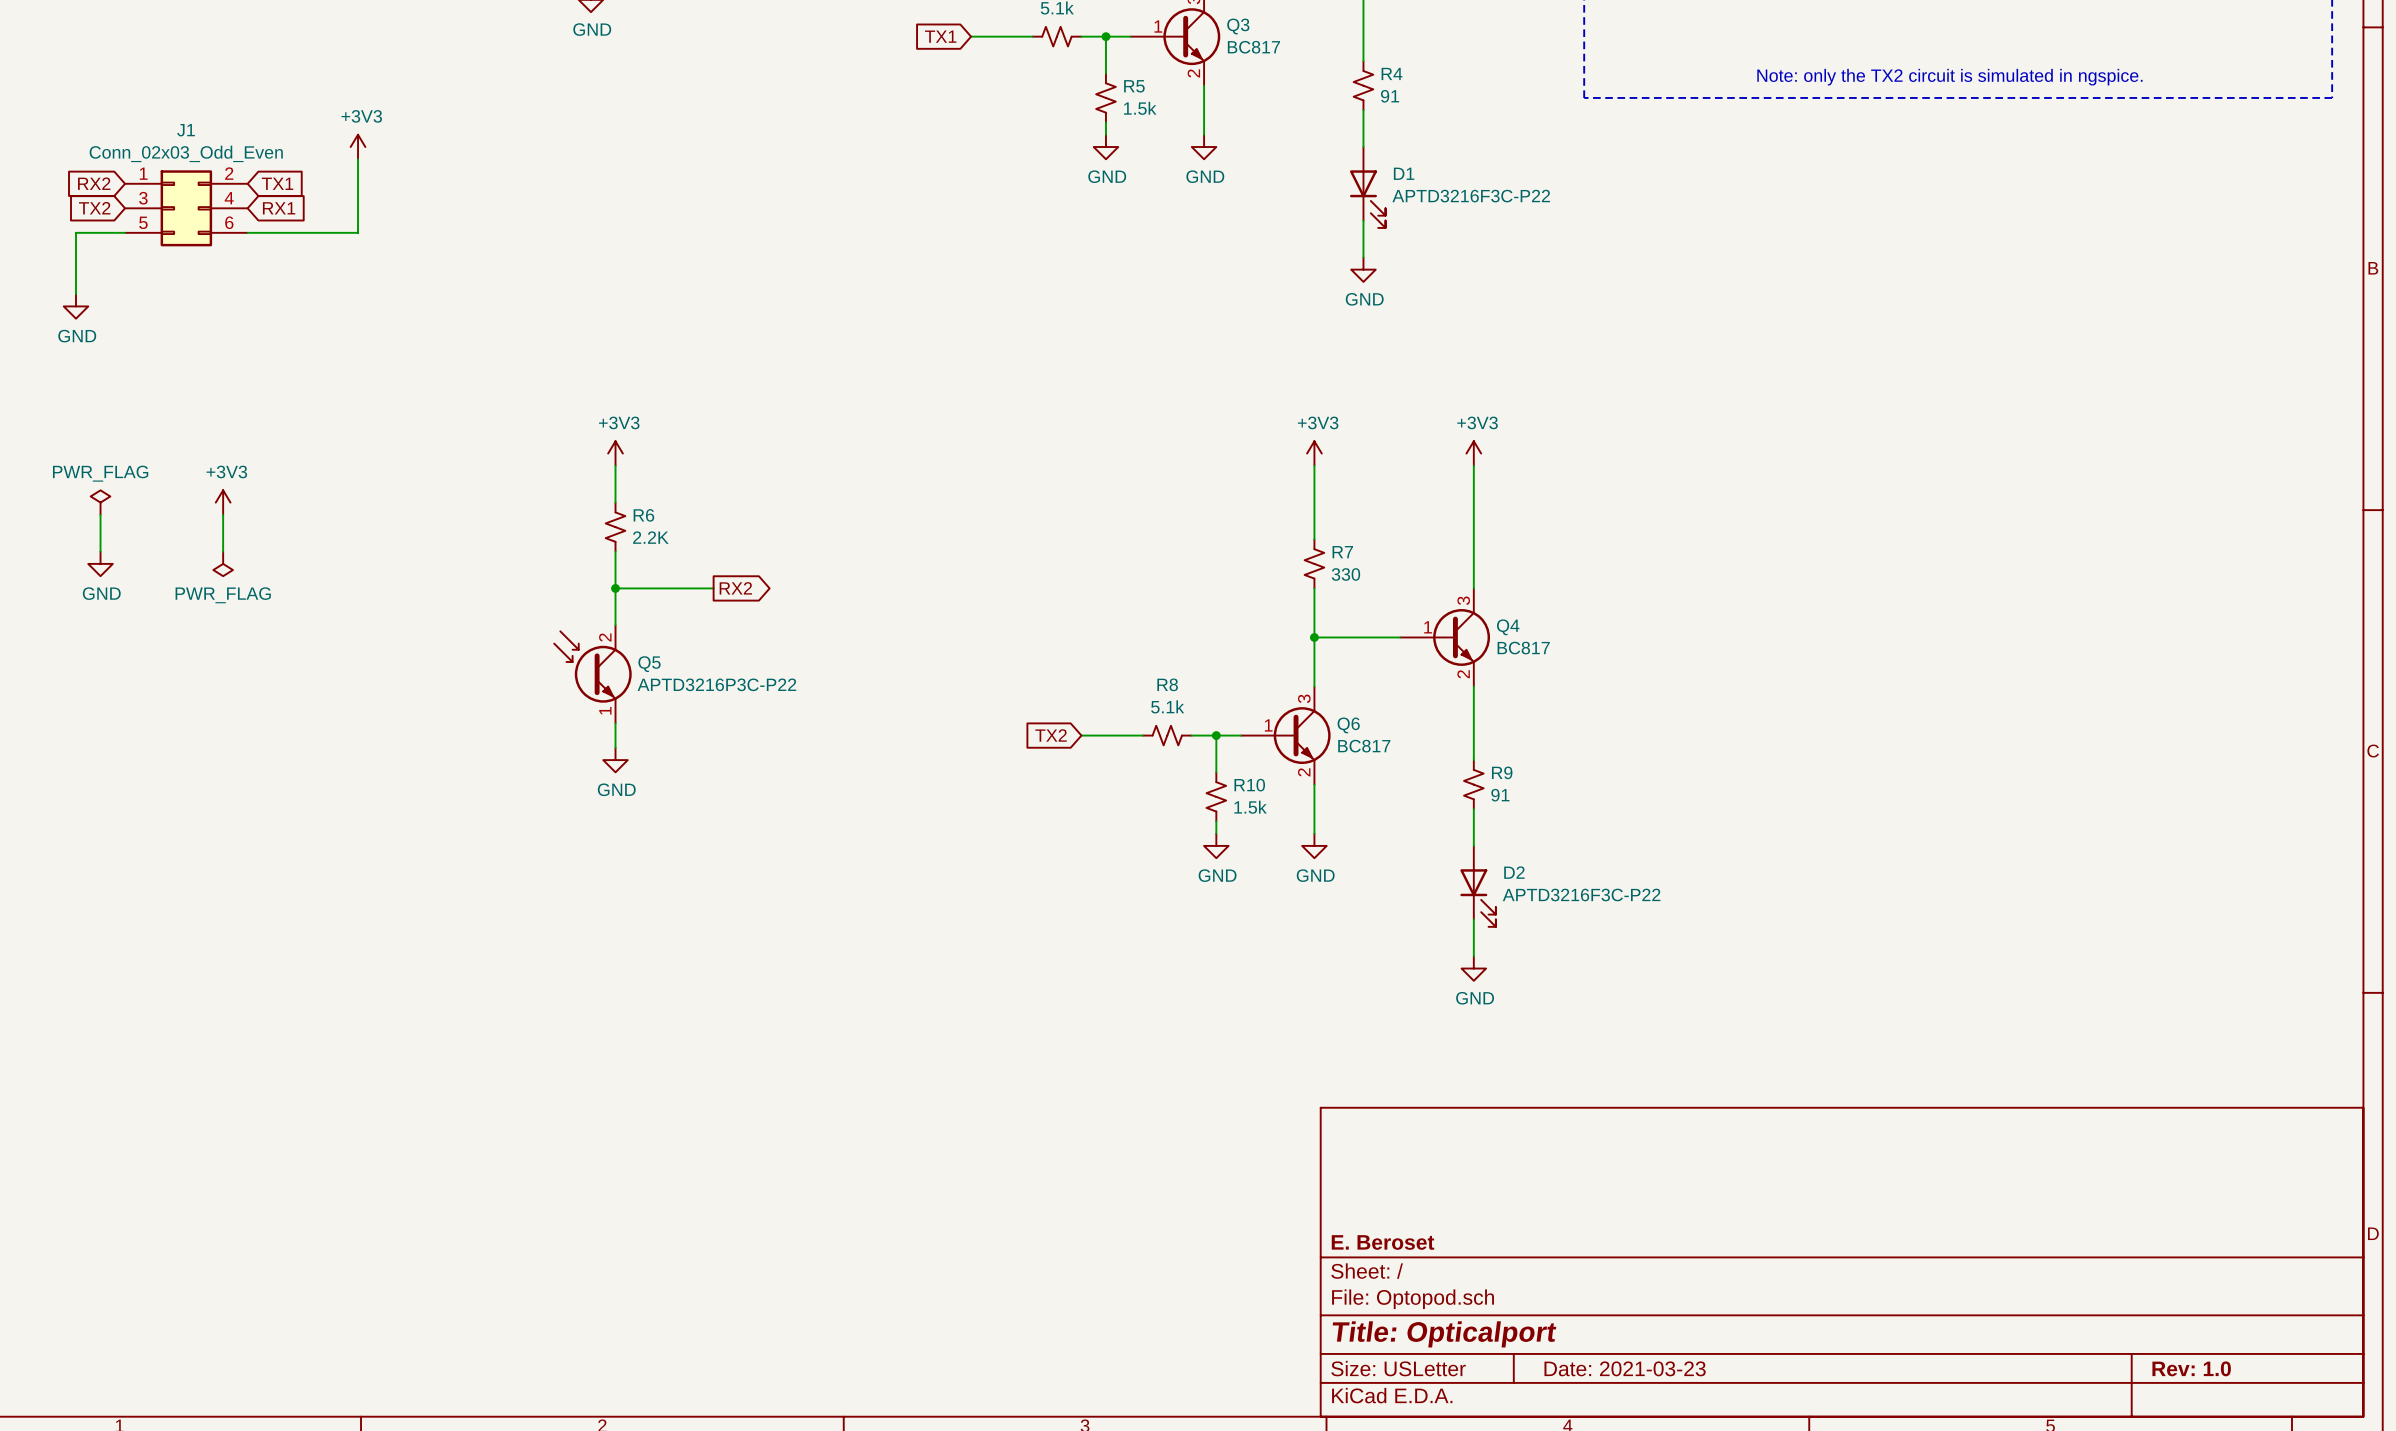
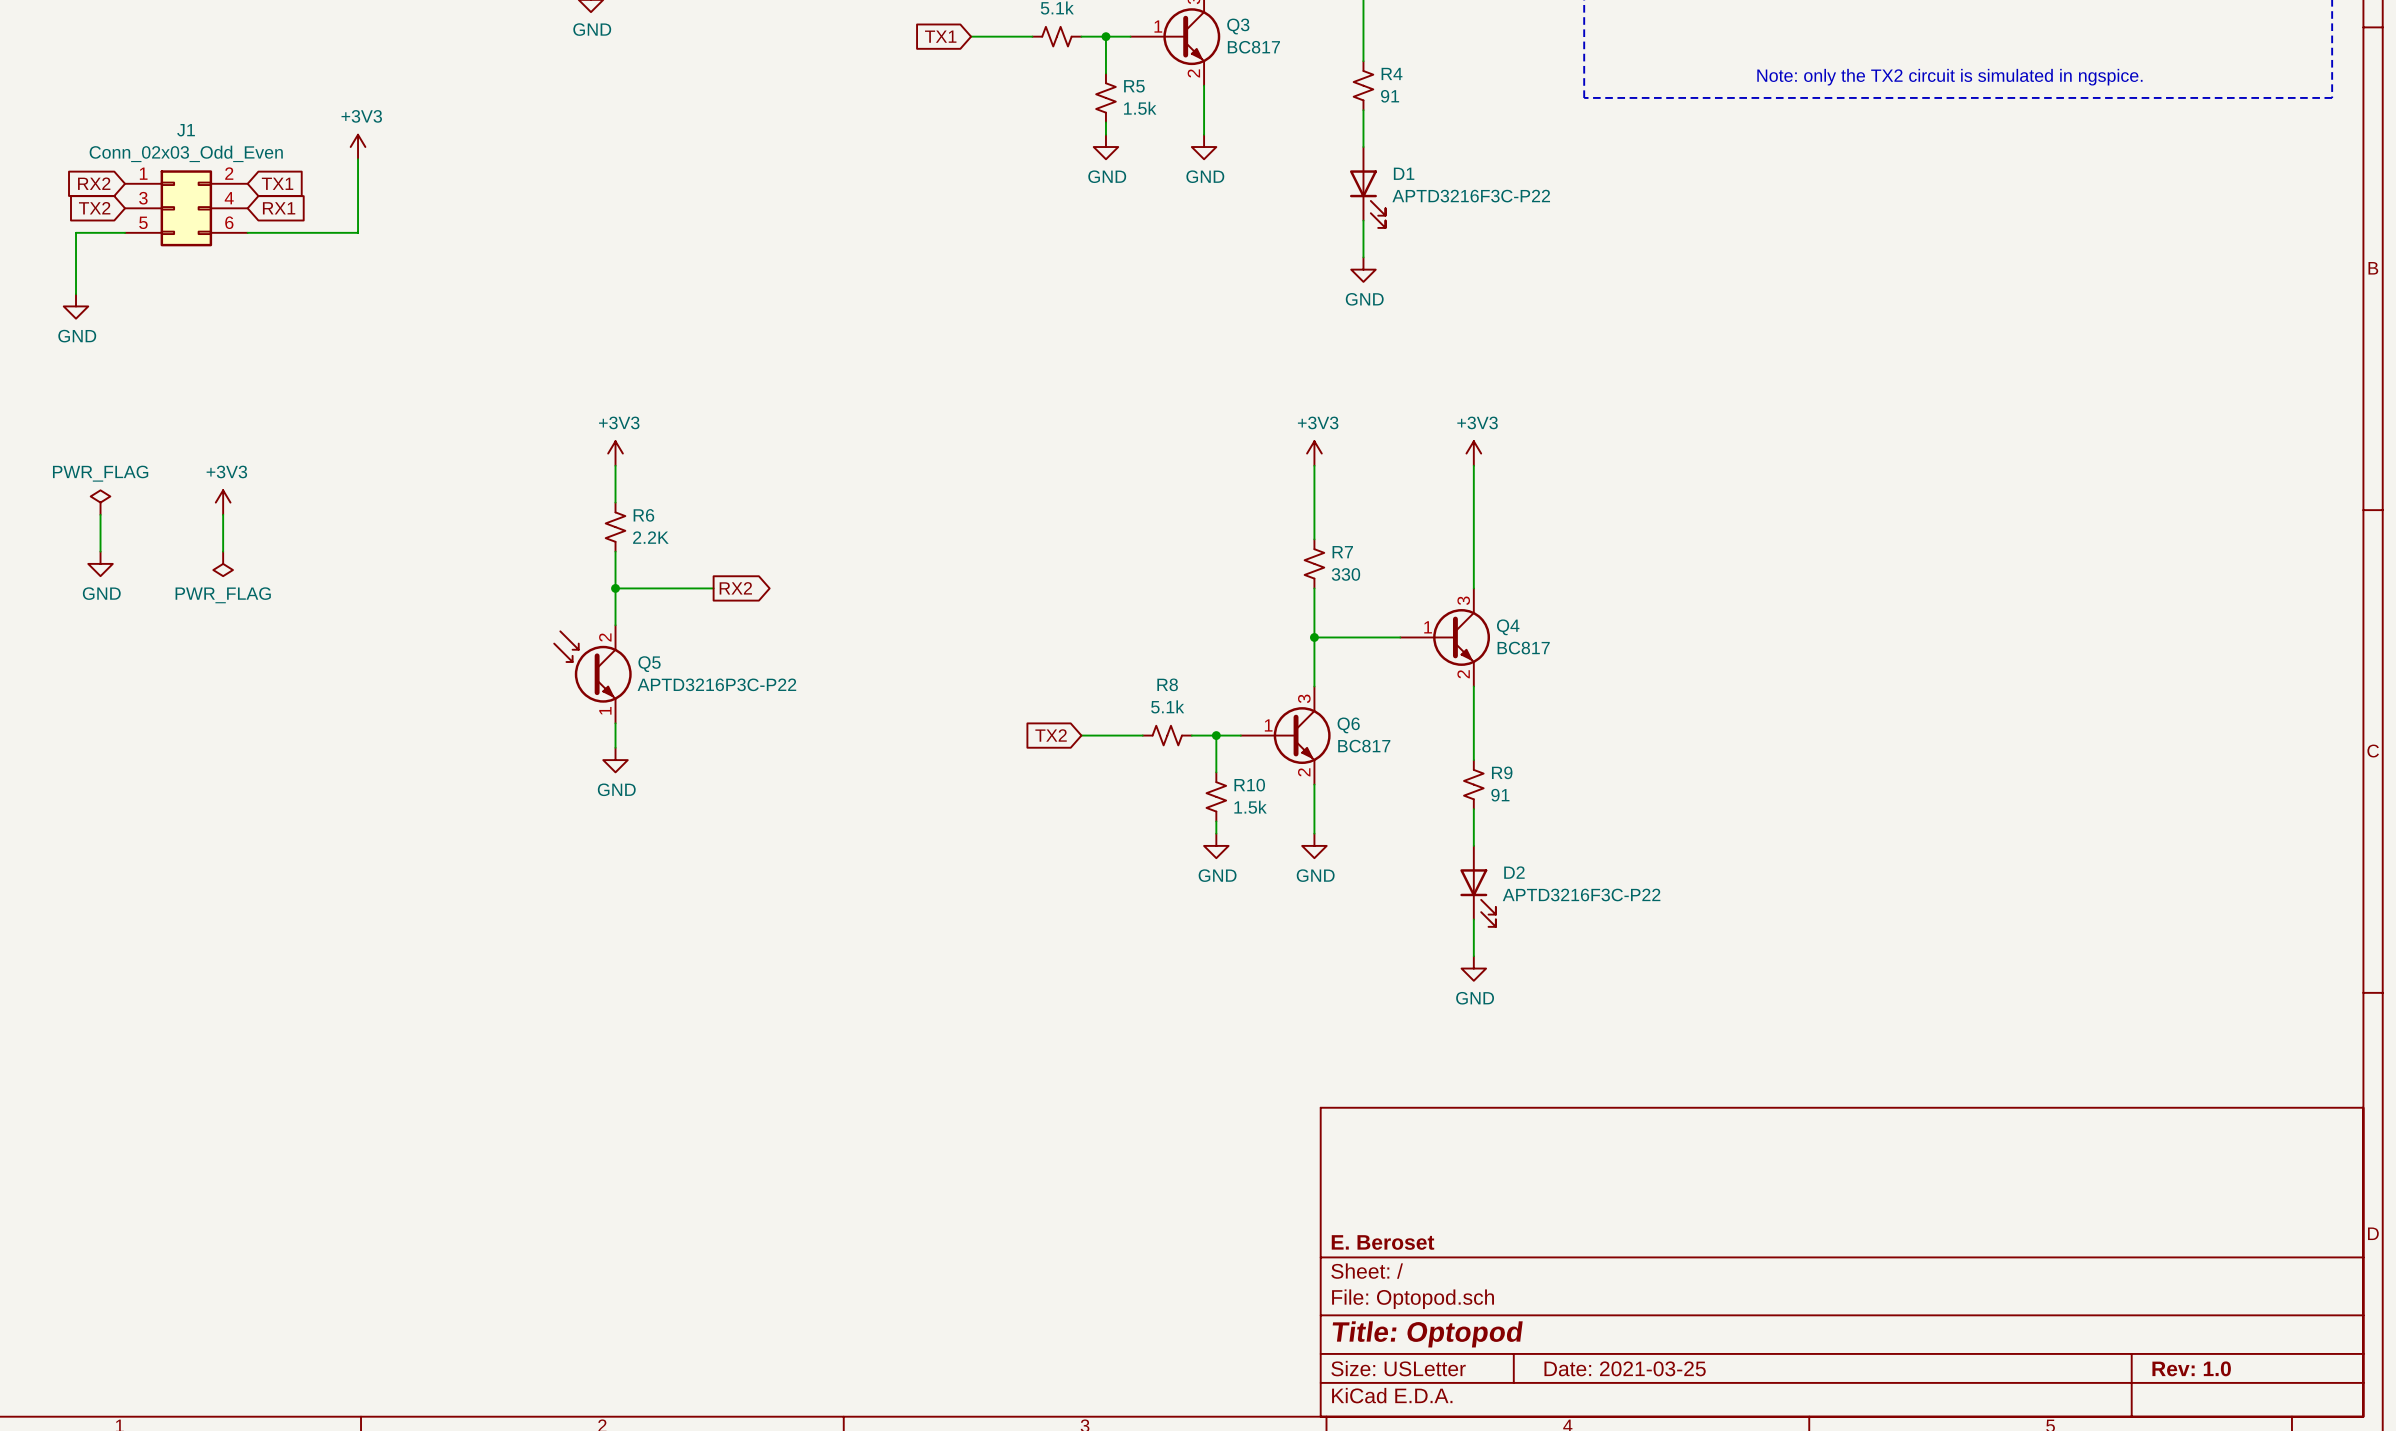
title block: Title: Opticalport (1444, 1334) -> Title: Optopod (1427, 1334)
title block: Date: 2021-03-23 (1625, 1368) -> Date: 2021-03-25 (1625, 1368)

